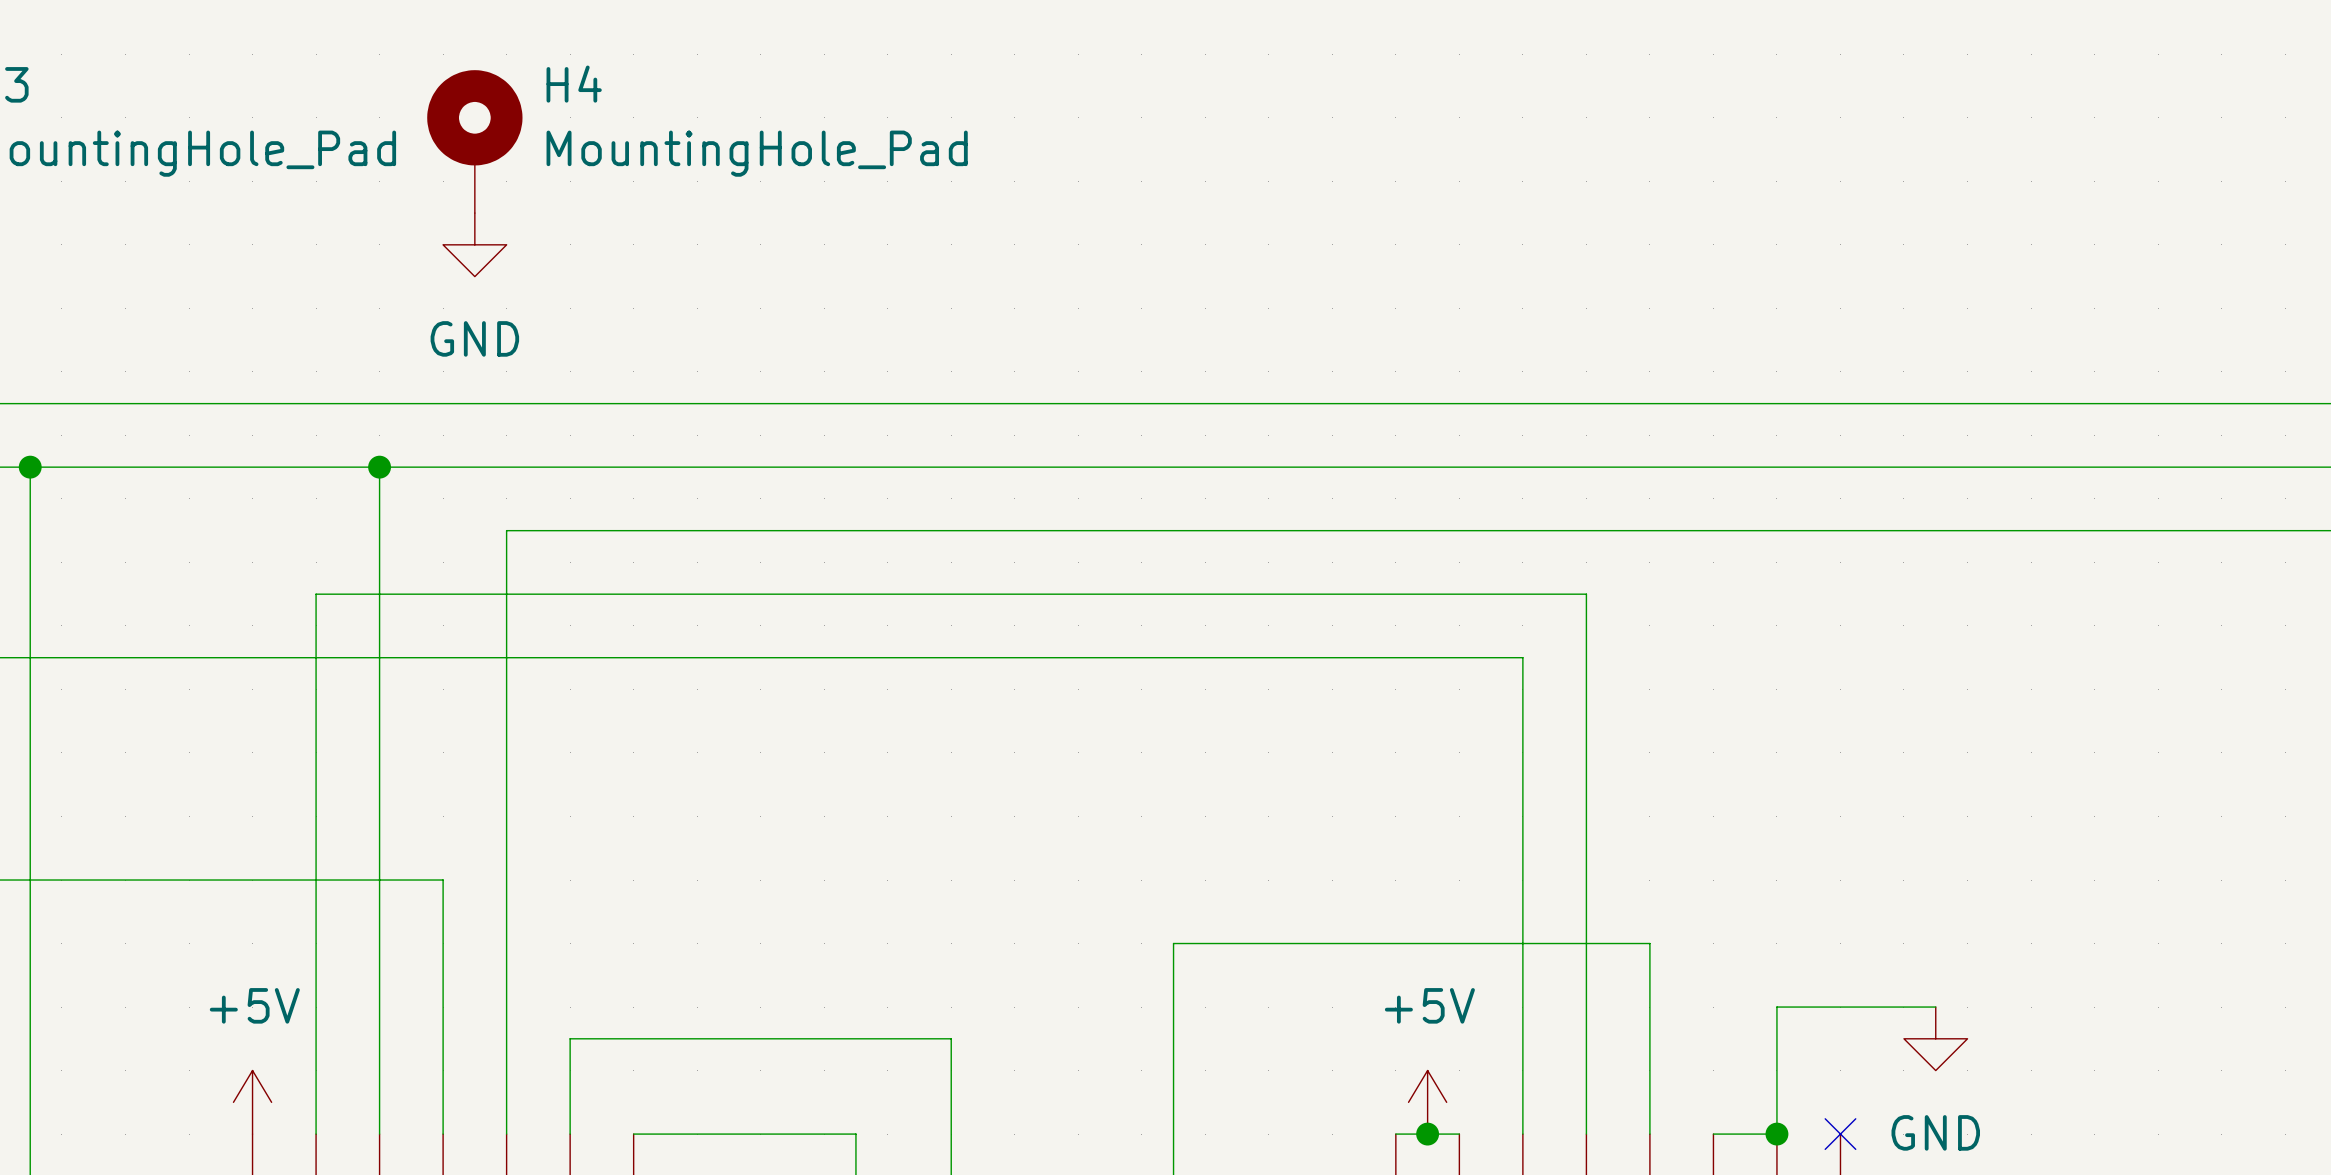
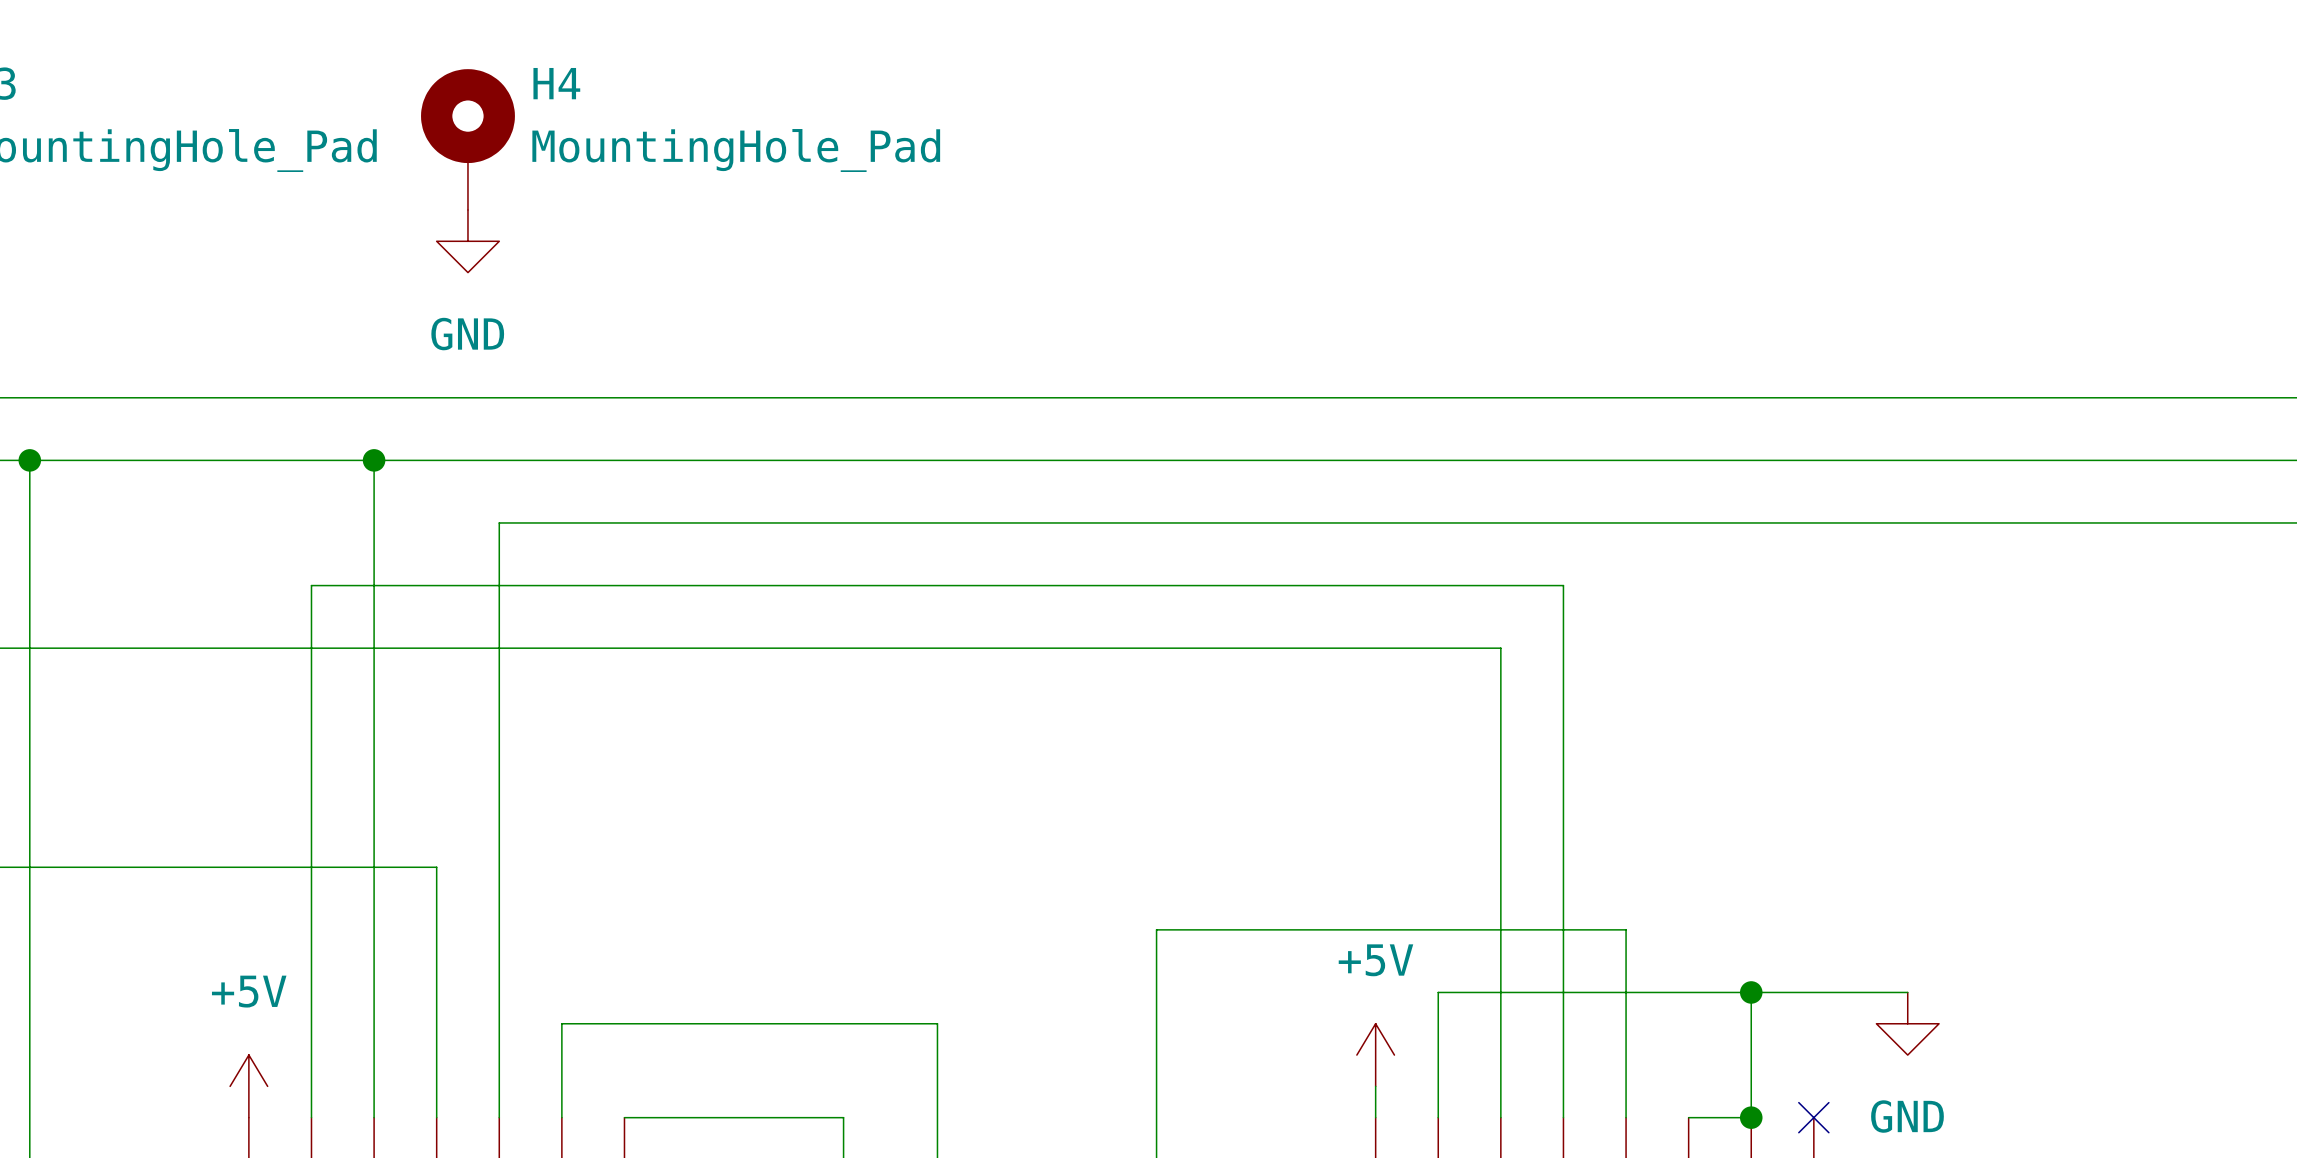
wire: none -> (1751, 992) (1438, 992) (1438, 1117)
junction: none -> (1751, 992)
power symbol position: +5V (1427, 1102) -> +5V (1375, 1055)
wire: (1395, 1134) (1459, 1134) -> (1375, 1117) (1375, 1086)
junction: (1427, 1134) -> none

